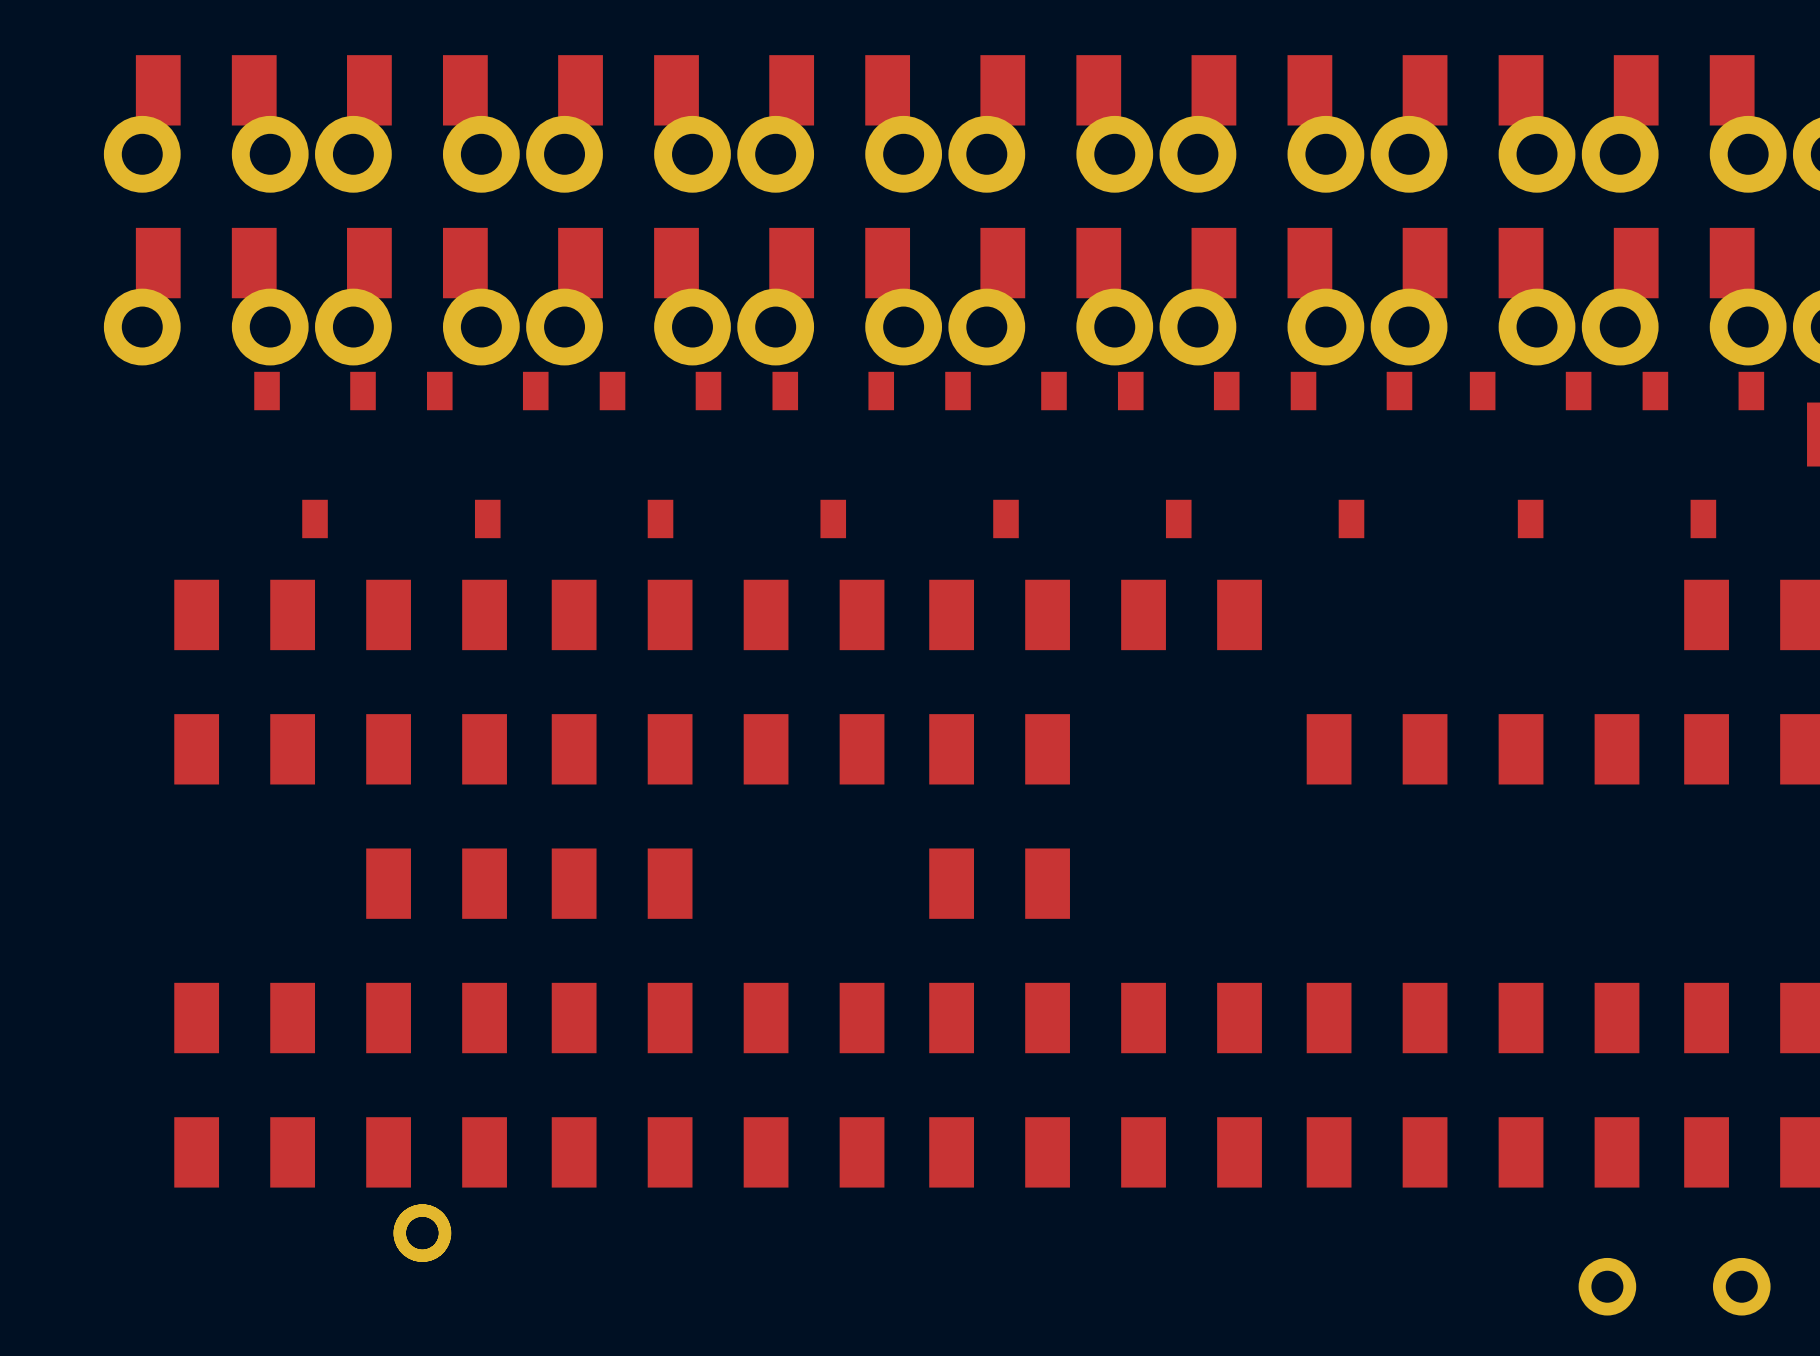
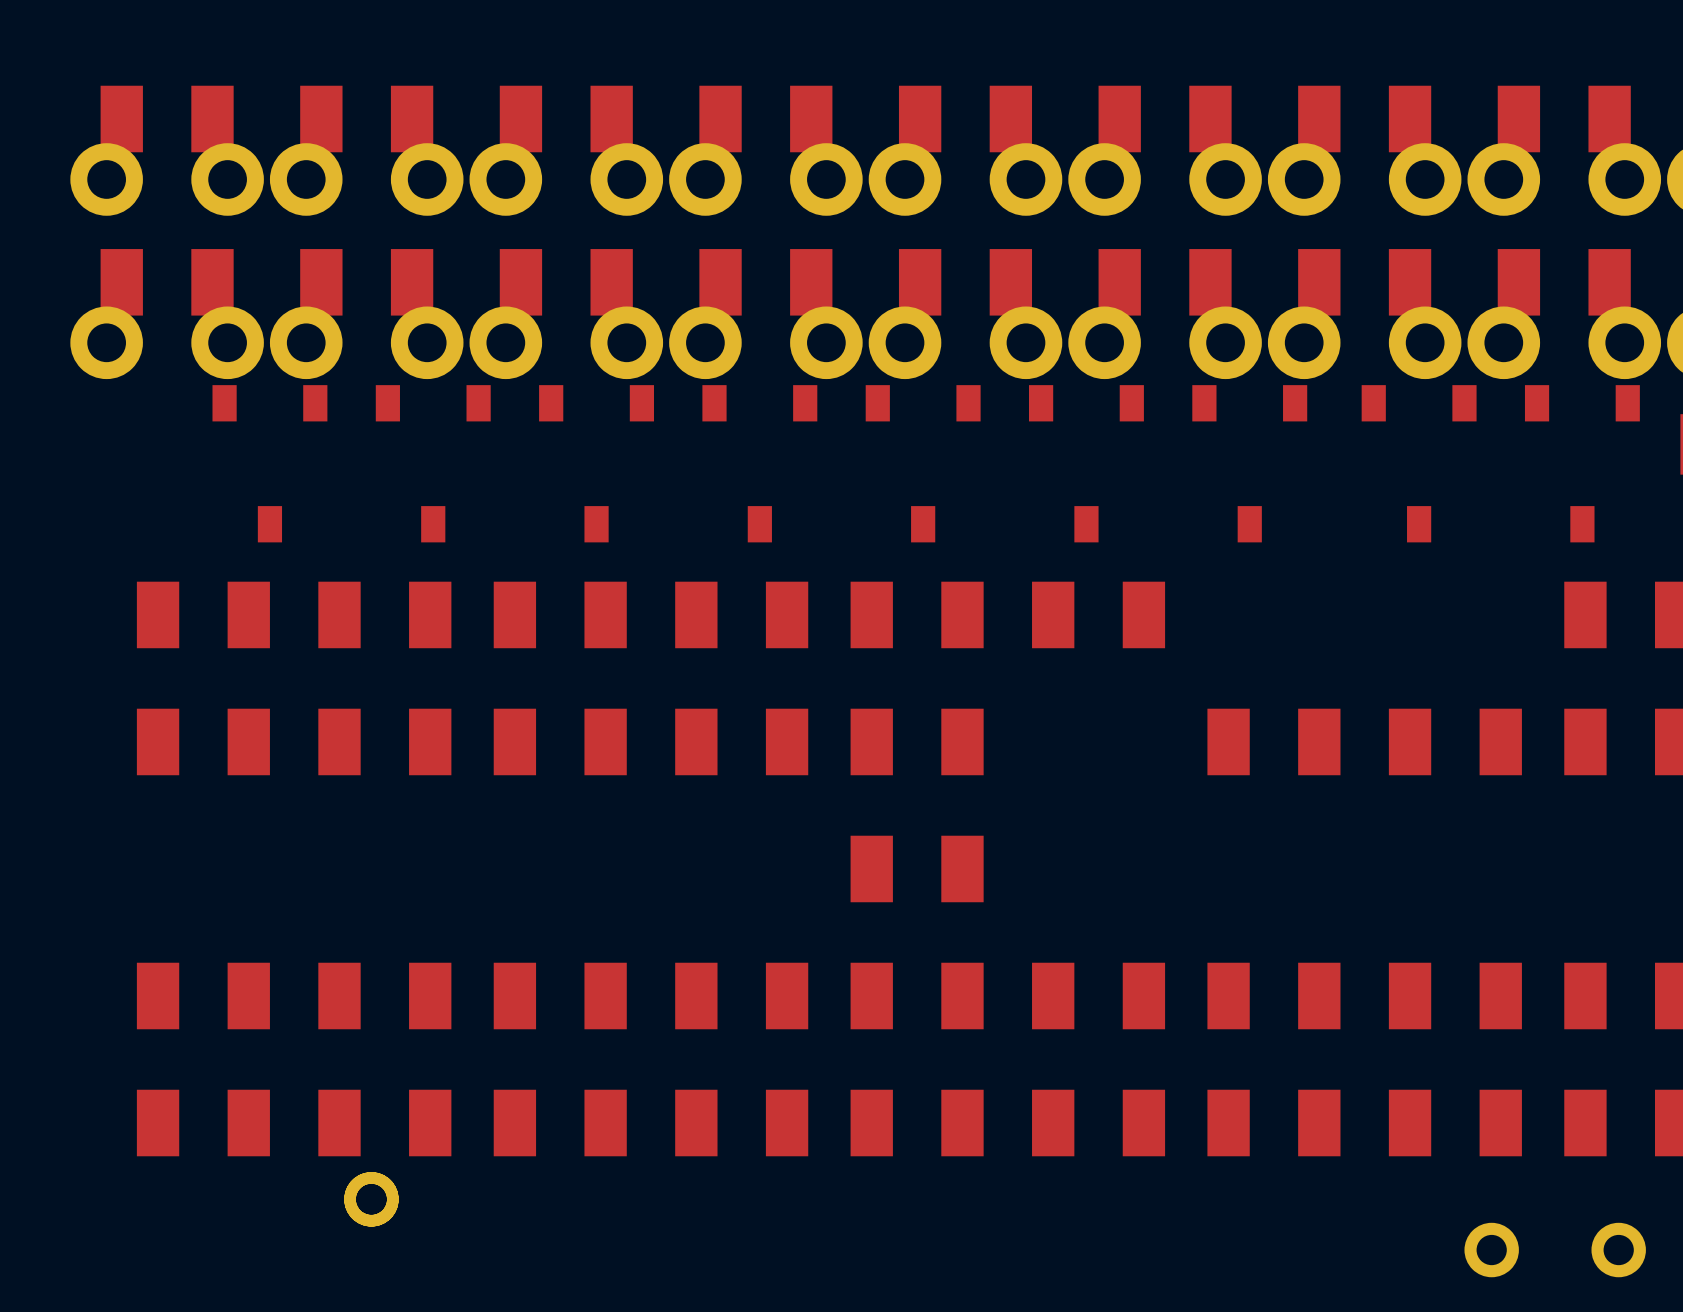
part: (436, 883) -> none
part: (622, 883) -> none

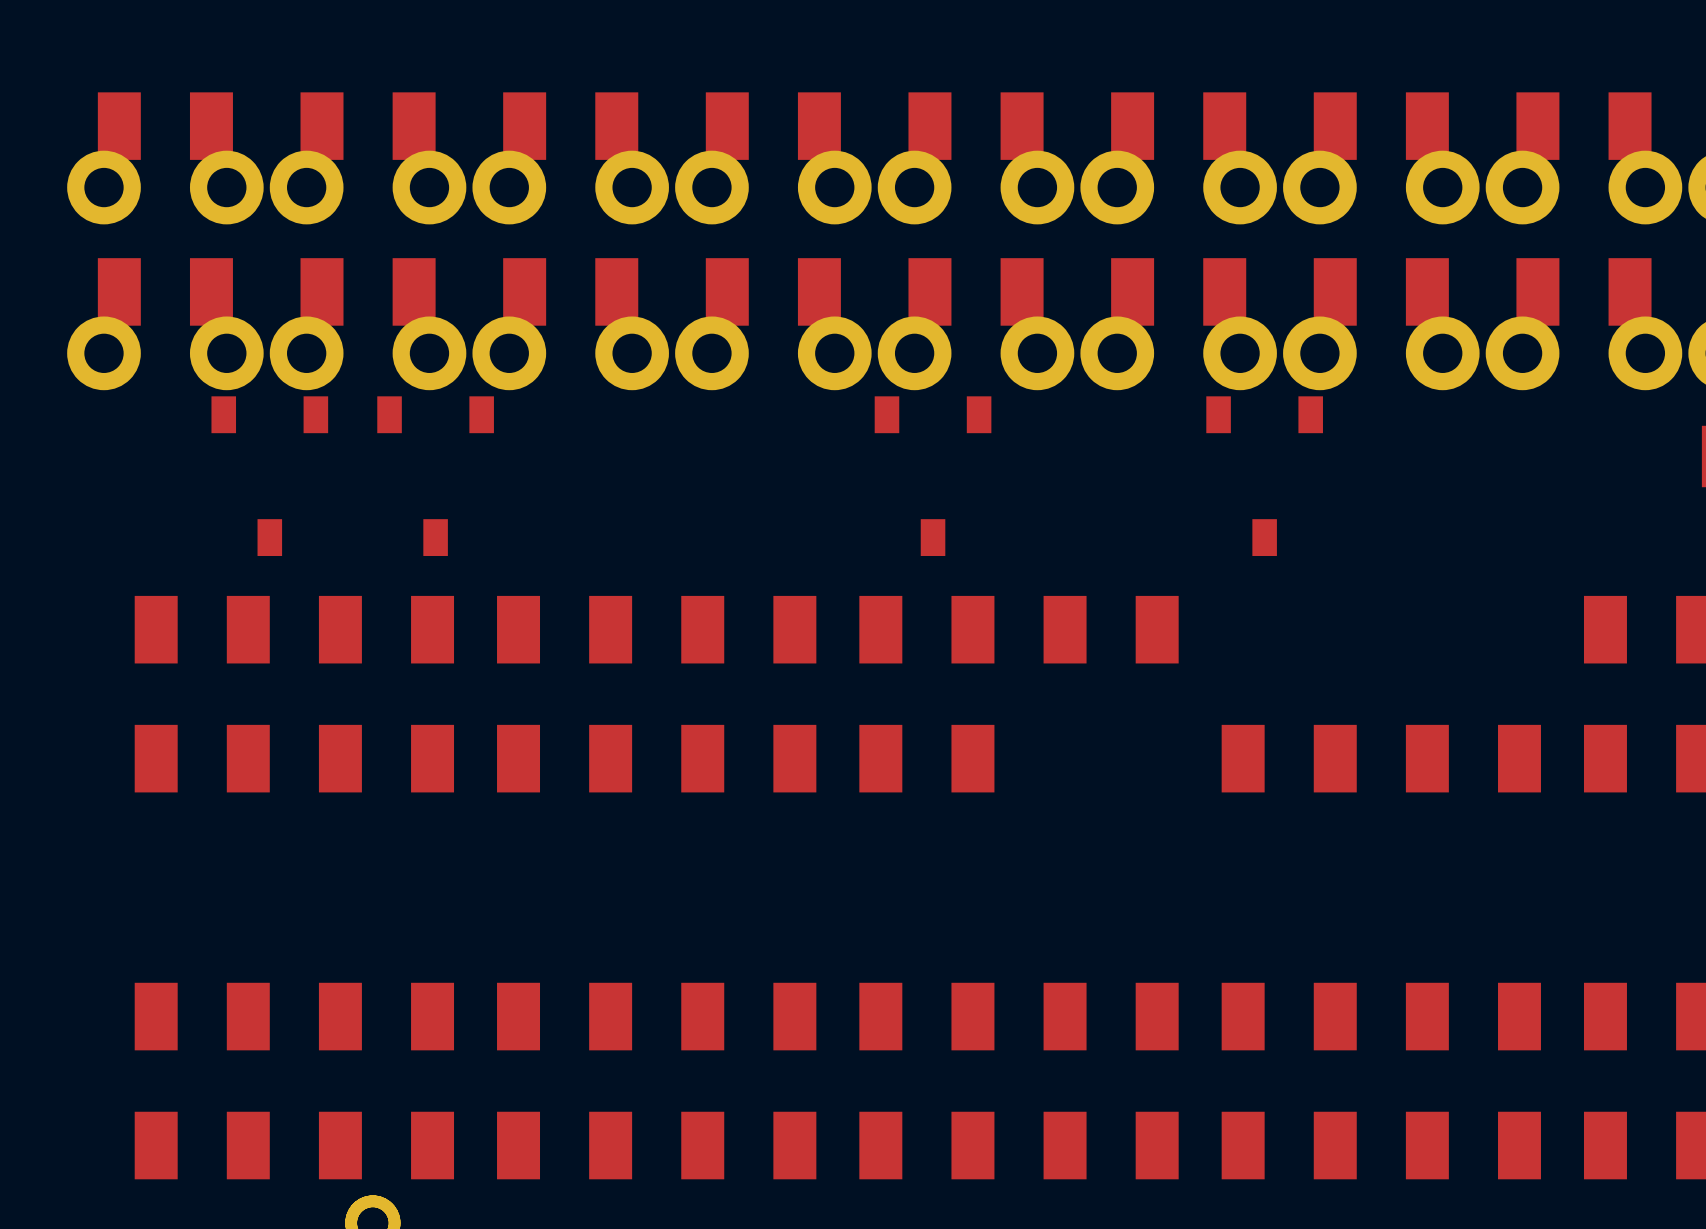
part: (596, 463) -> none
part: (759, 463) -> none
part: (1086, 463) -> none
part: (1419, 463) -> none
part: (1582, 463) -> none
part: (917, 868) -> none

